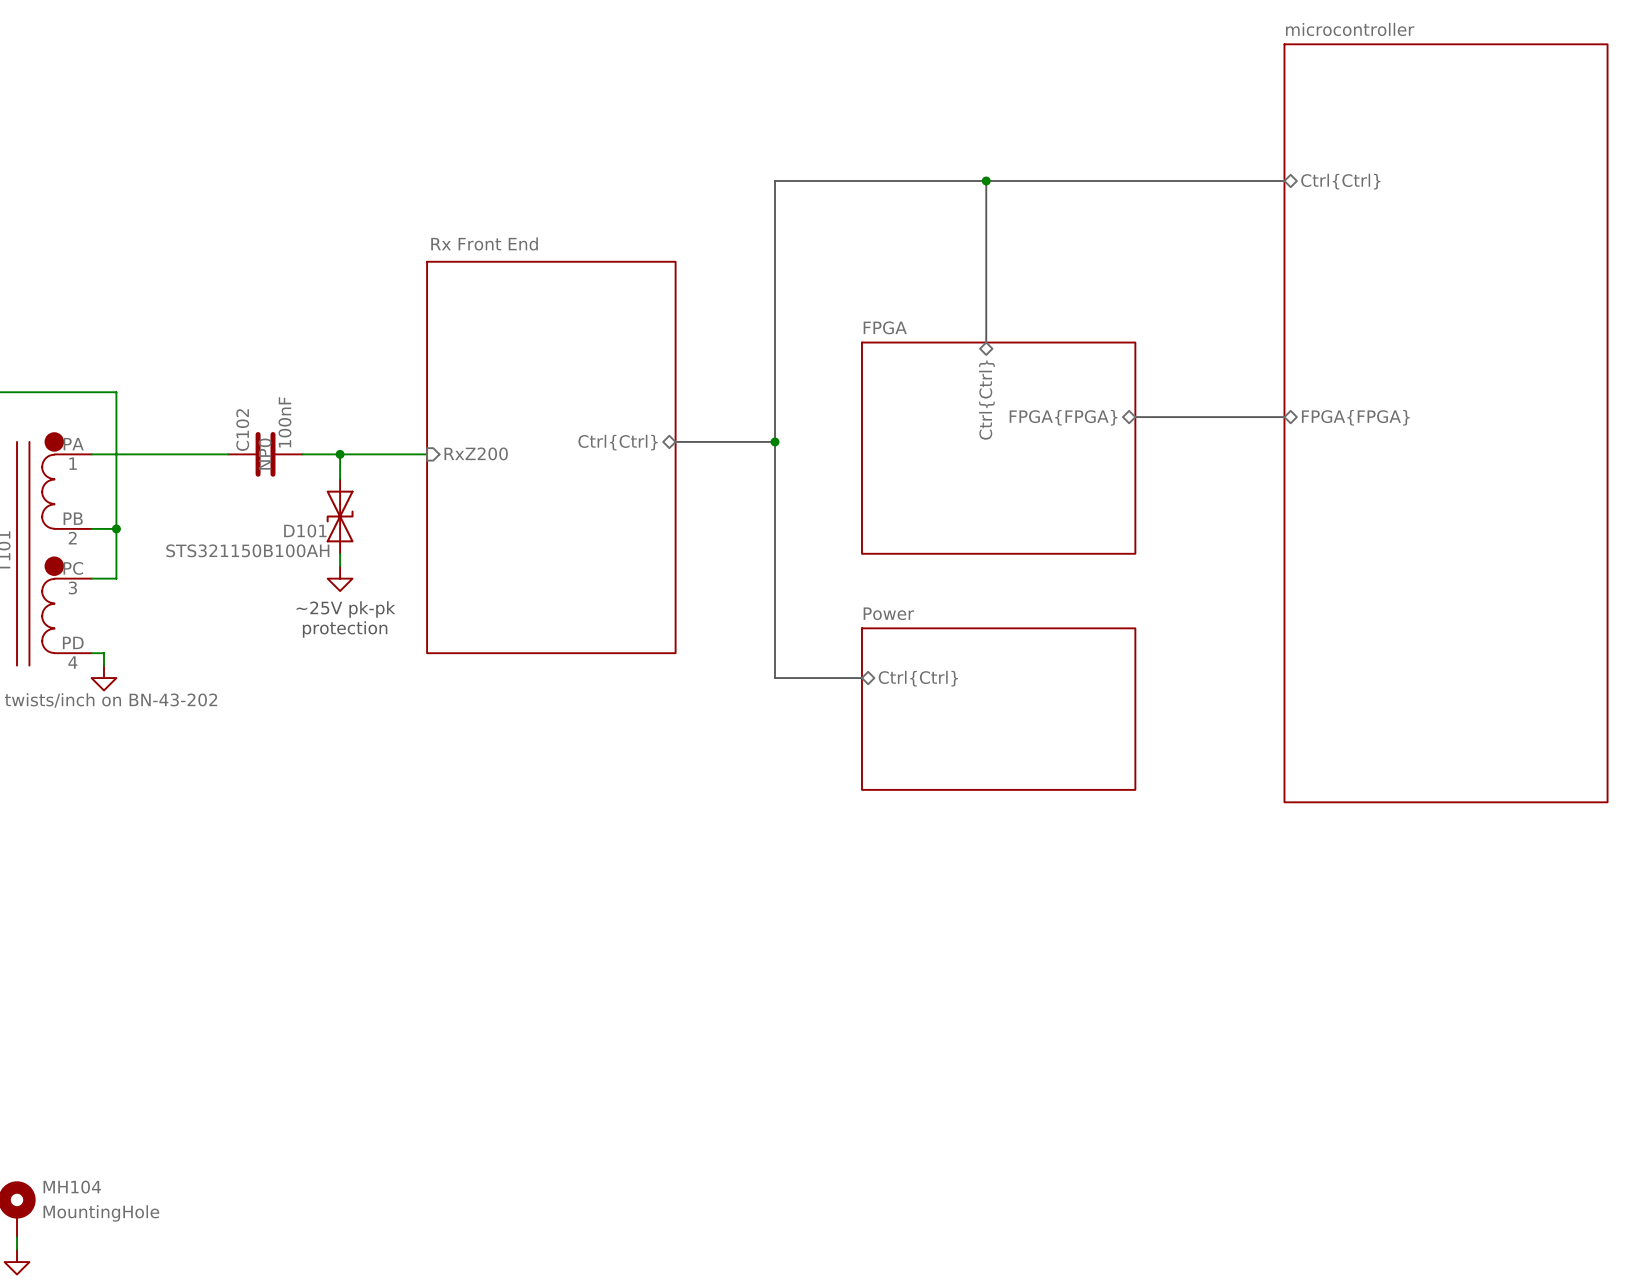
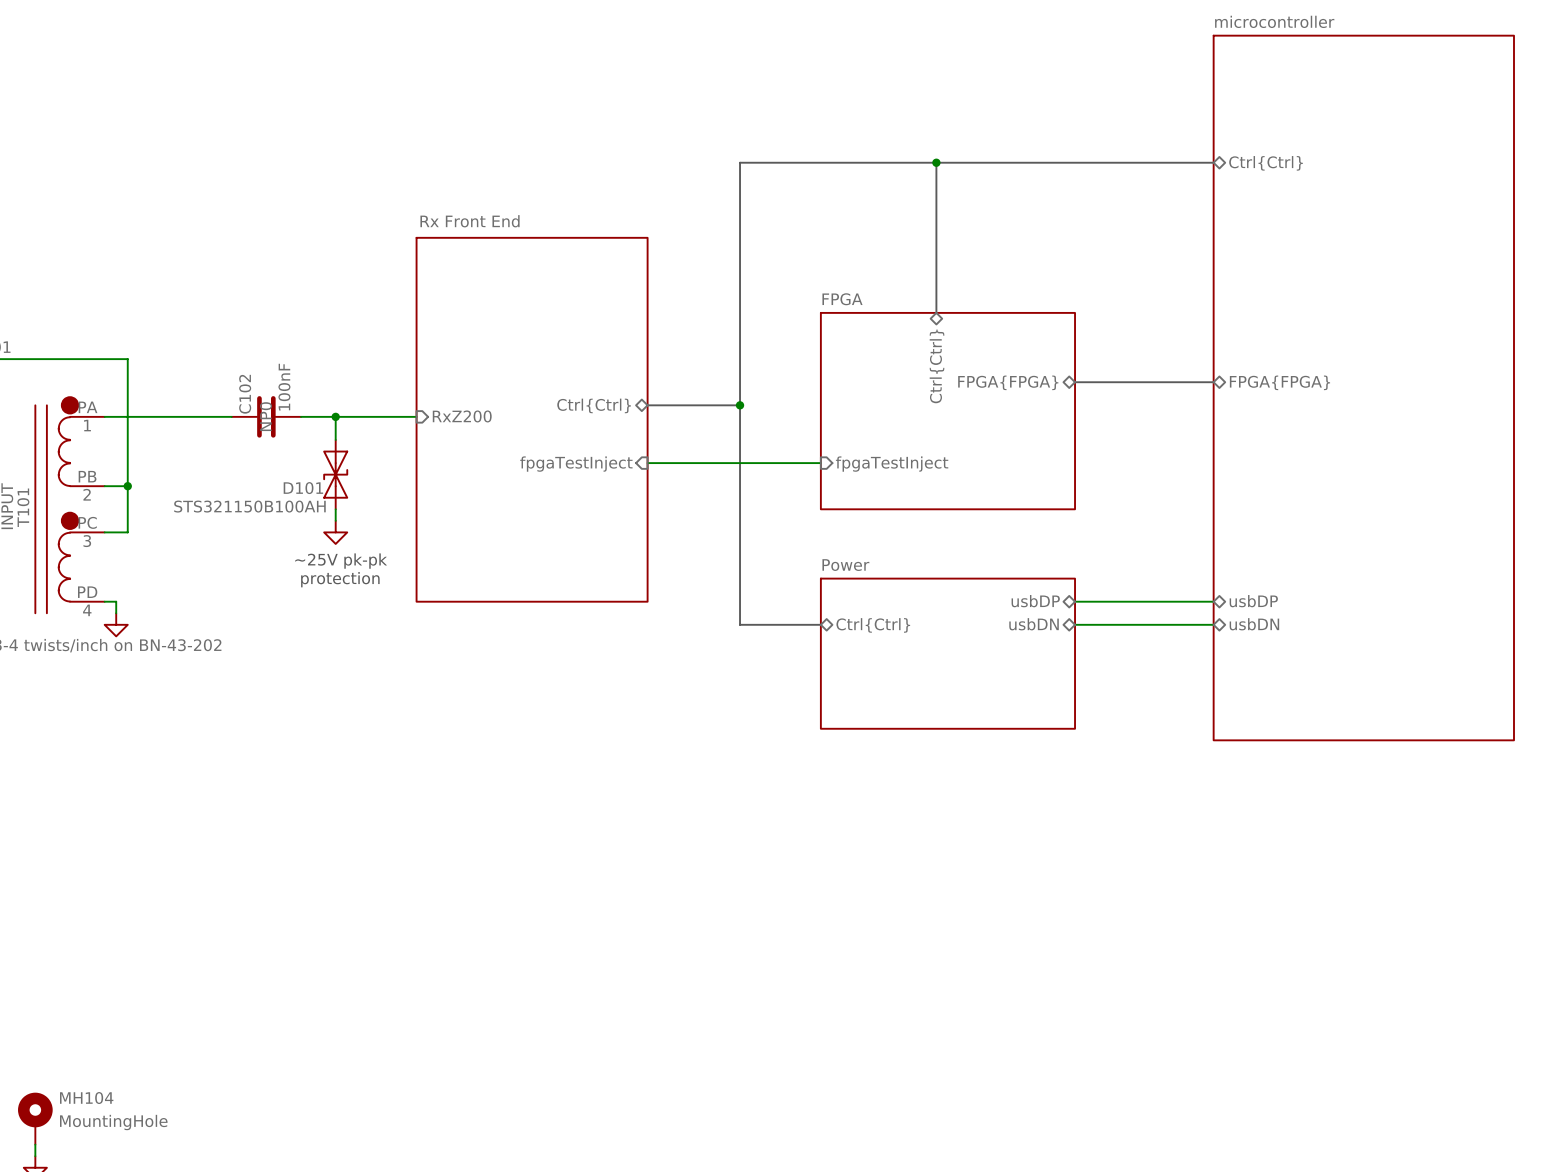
wire: none -> (647, 463) (820, 463)
sheet pin: none -> fpgaTestInject (576, 464)
sheet pin: none -> fpgaTestInject (892, 464)
sheet pin: none -> usbDP (1035, 601)
sheet pin: none -> usbDP (1253, 601)
wire: none -> (1075, 601) (1213, 601)
sheet pin: none -> usbDN (1034, 624)
sheet pin: none -> usbDN (1254, 624)
wire: none -> (1075, 624) (1213, 624)

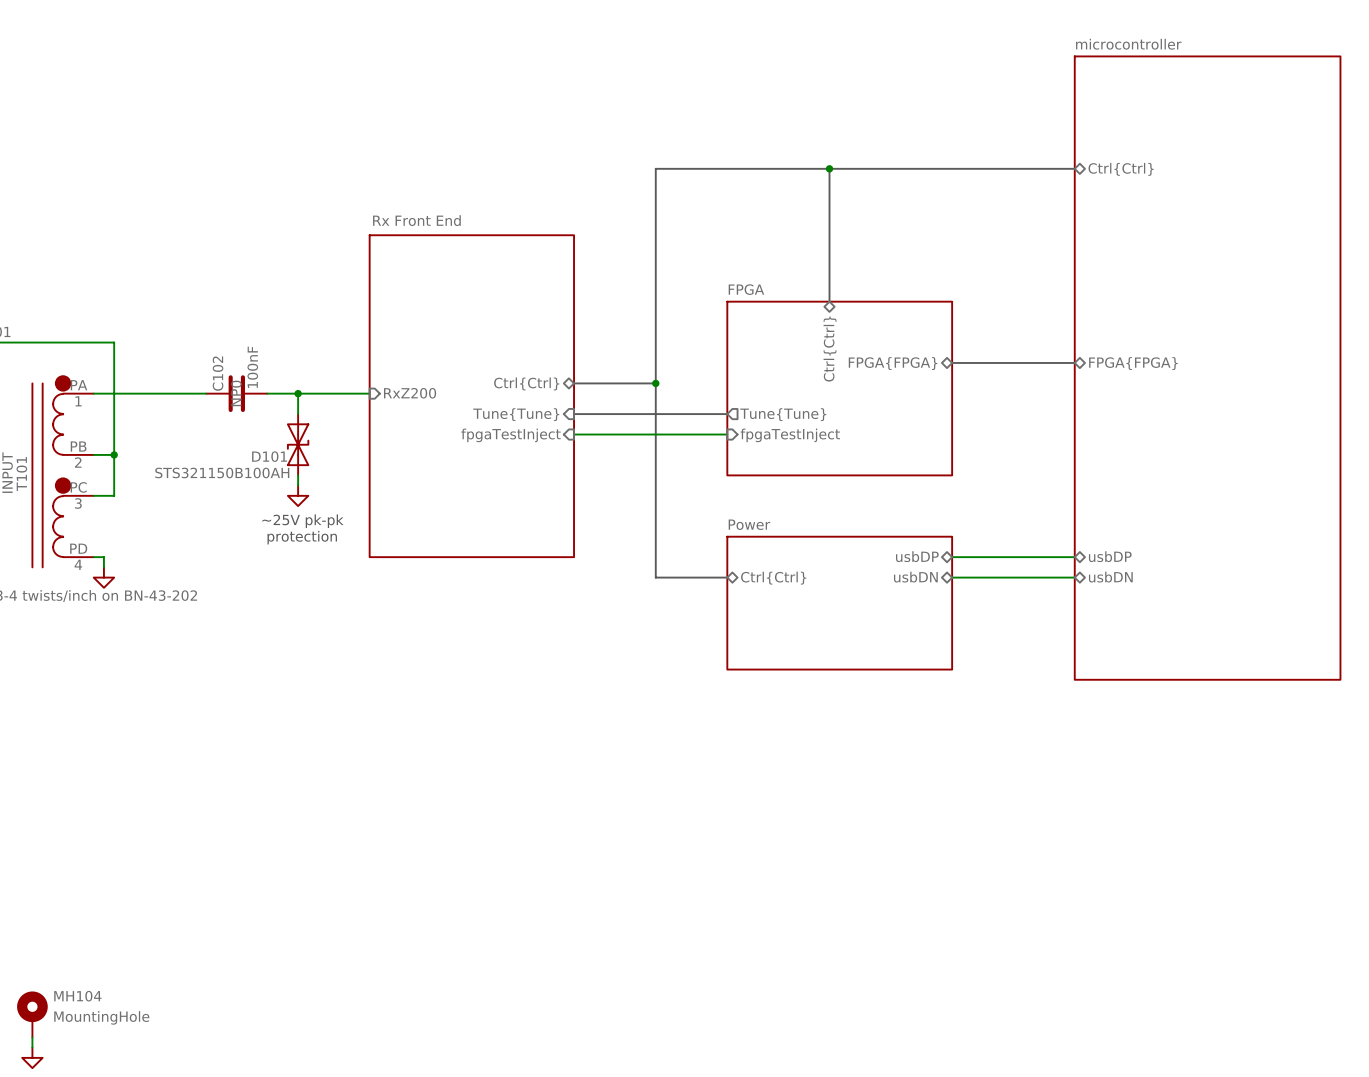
bus: none -> (574, 414) (727, 414)
sheet pin: none -> Tune{Tune} (516, 414)
sheet pin: none -> Tune{Tune} (783, 414)

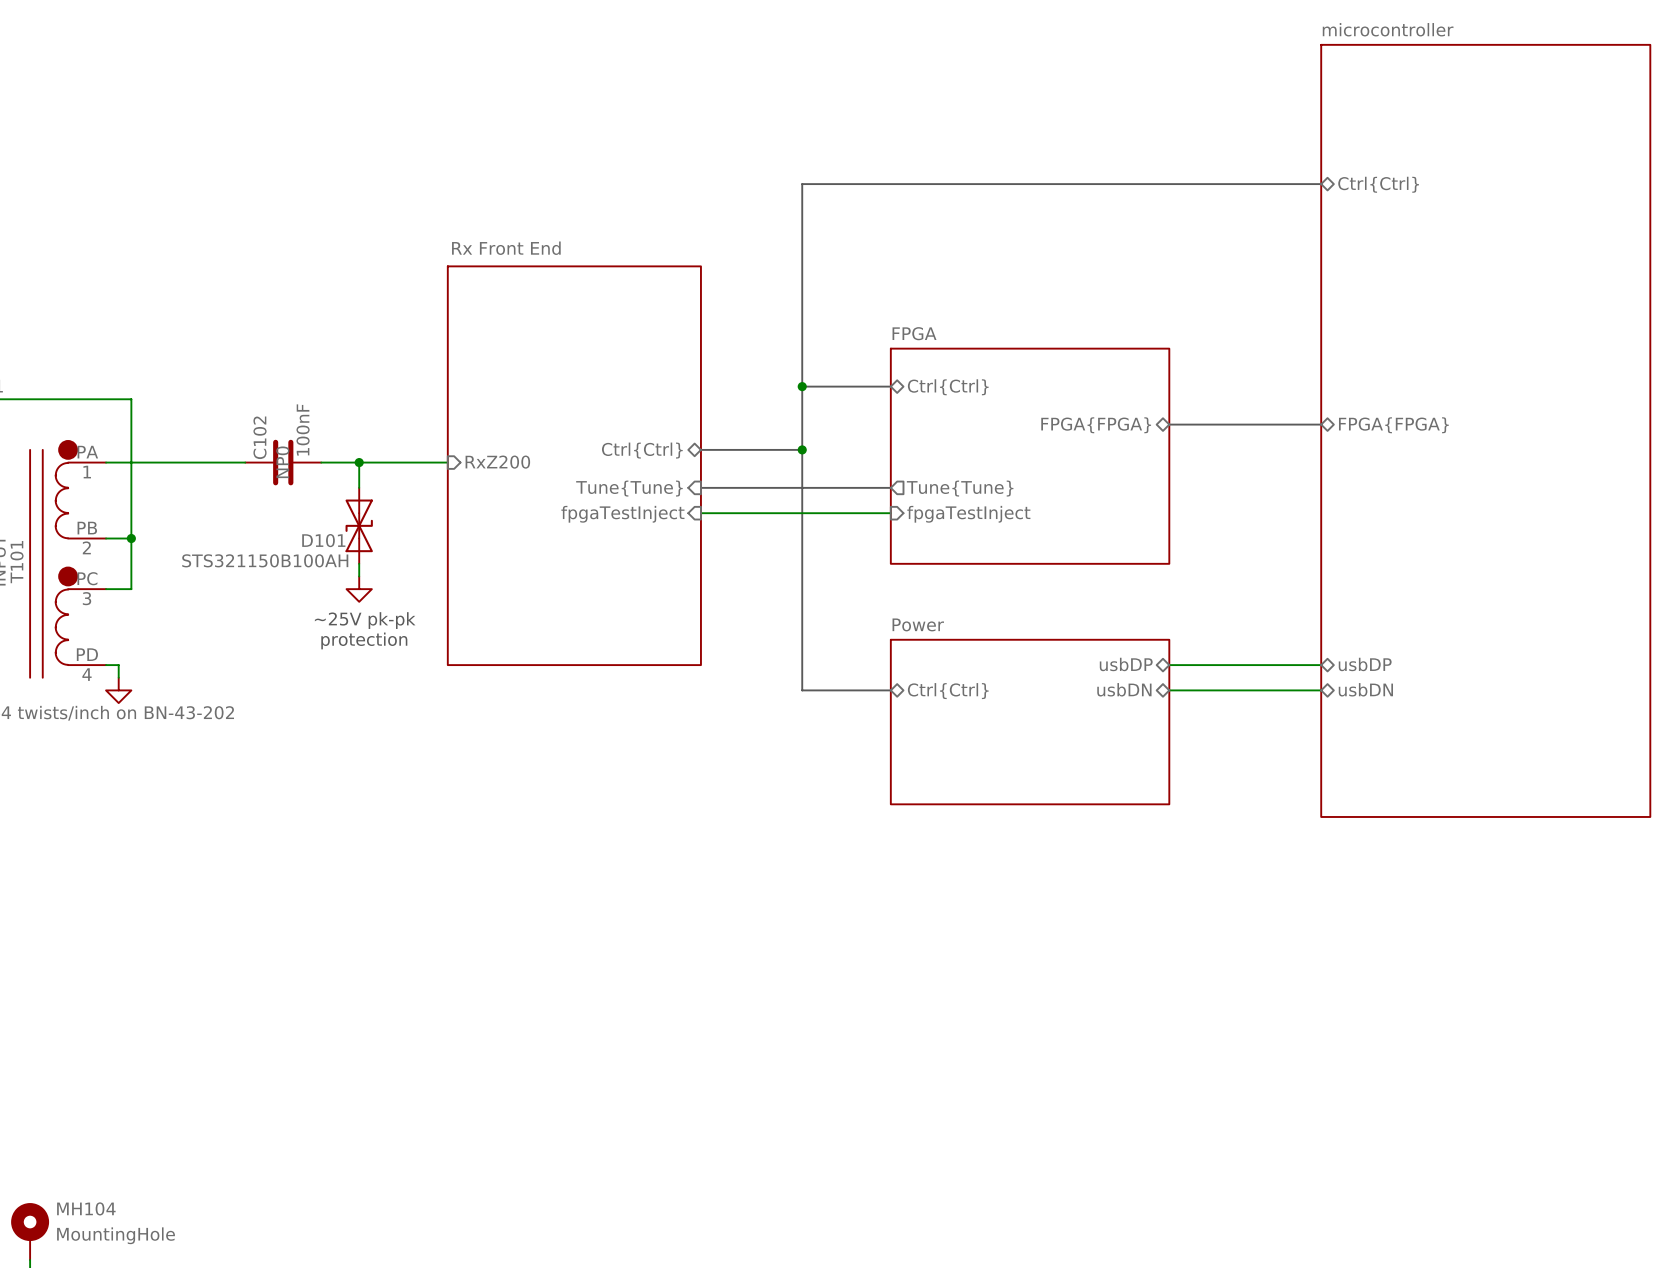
bus: (829, 168) (829, 301) -> none
junction: (829, 168) -> none
bus: none -> (802, 386) (890, 386)
junction: none -> (802, 386)
sheet pin rotation: 0° (830, 348) -> 90° counterclockwise (948, 387)

